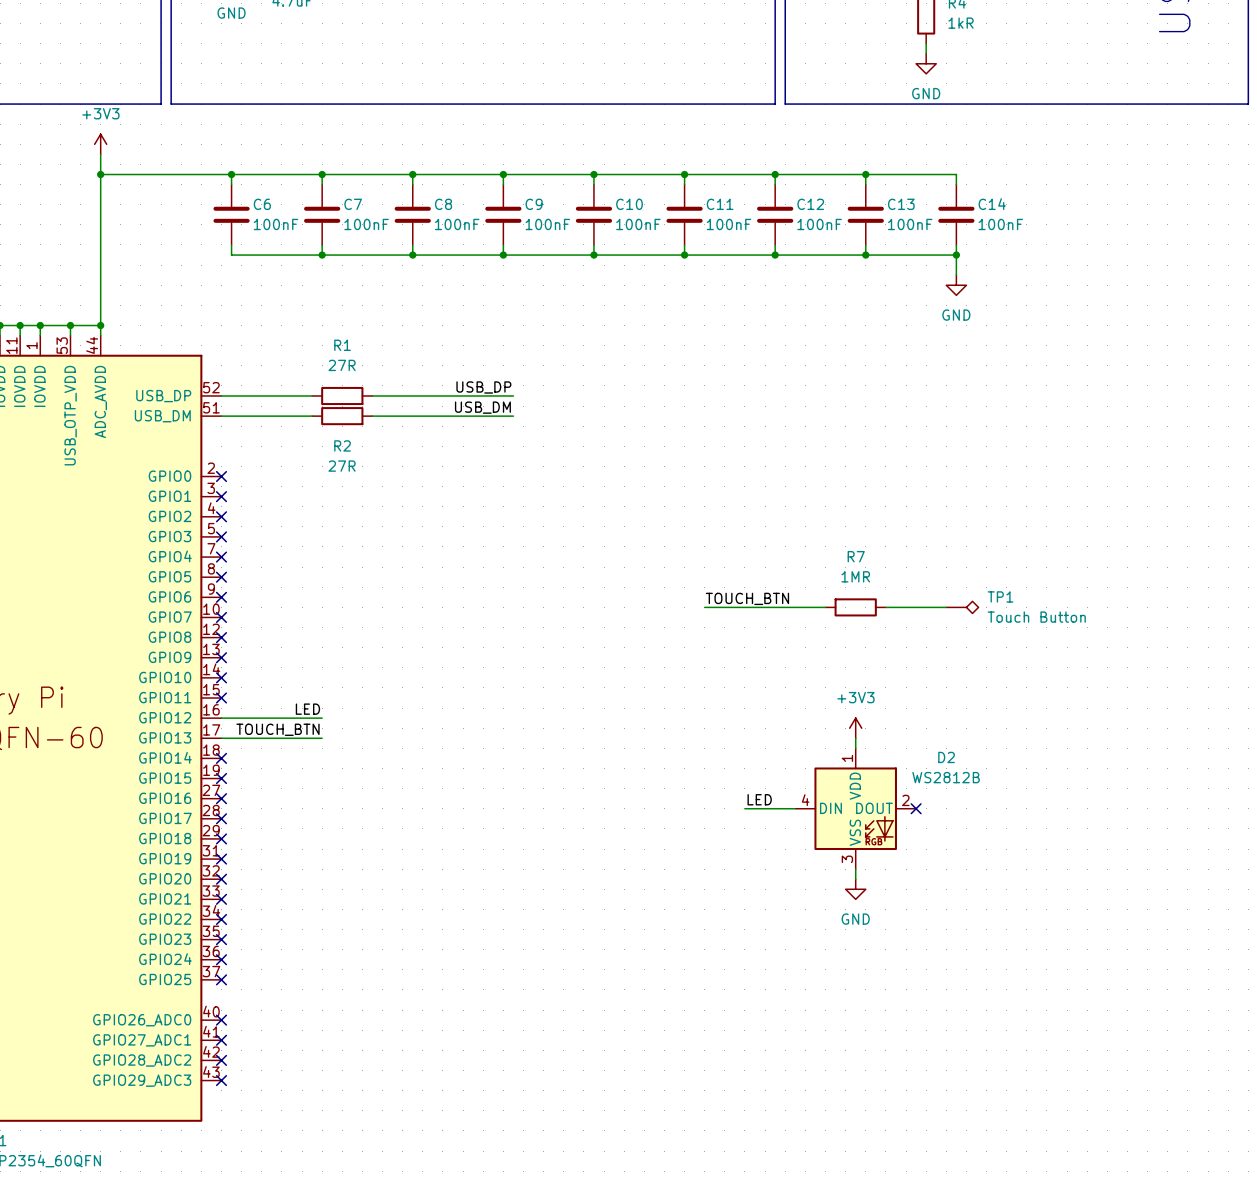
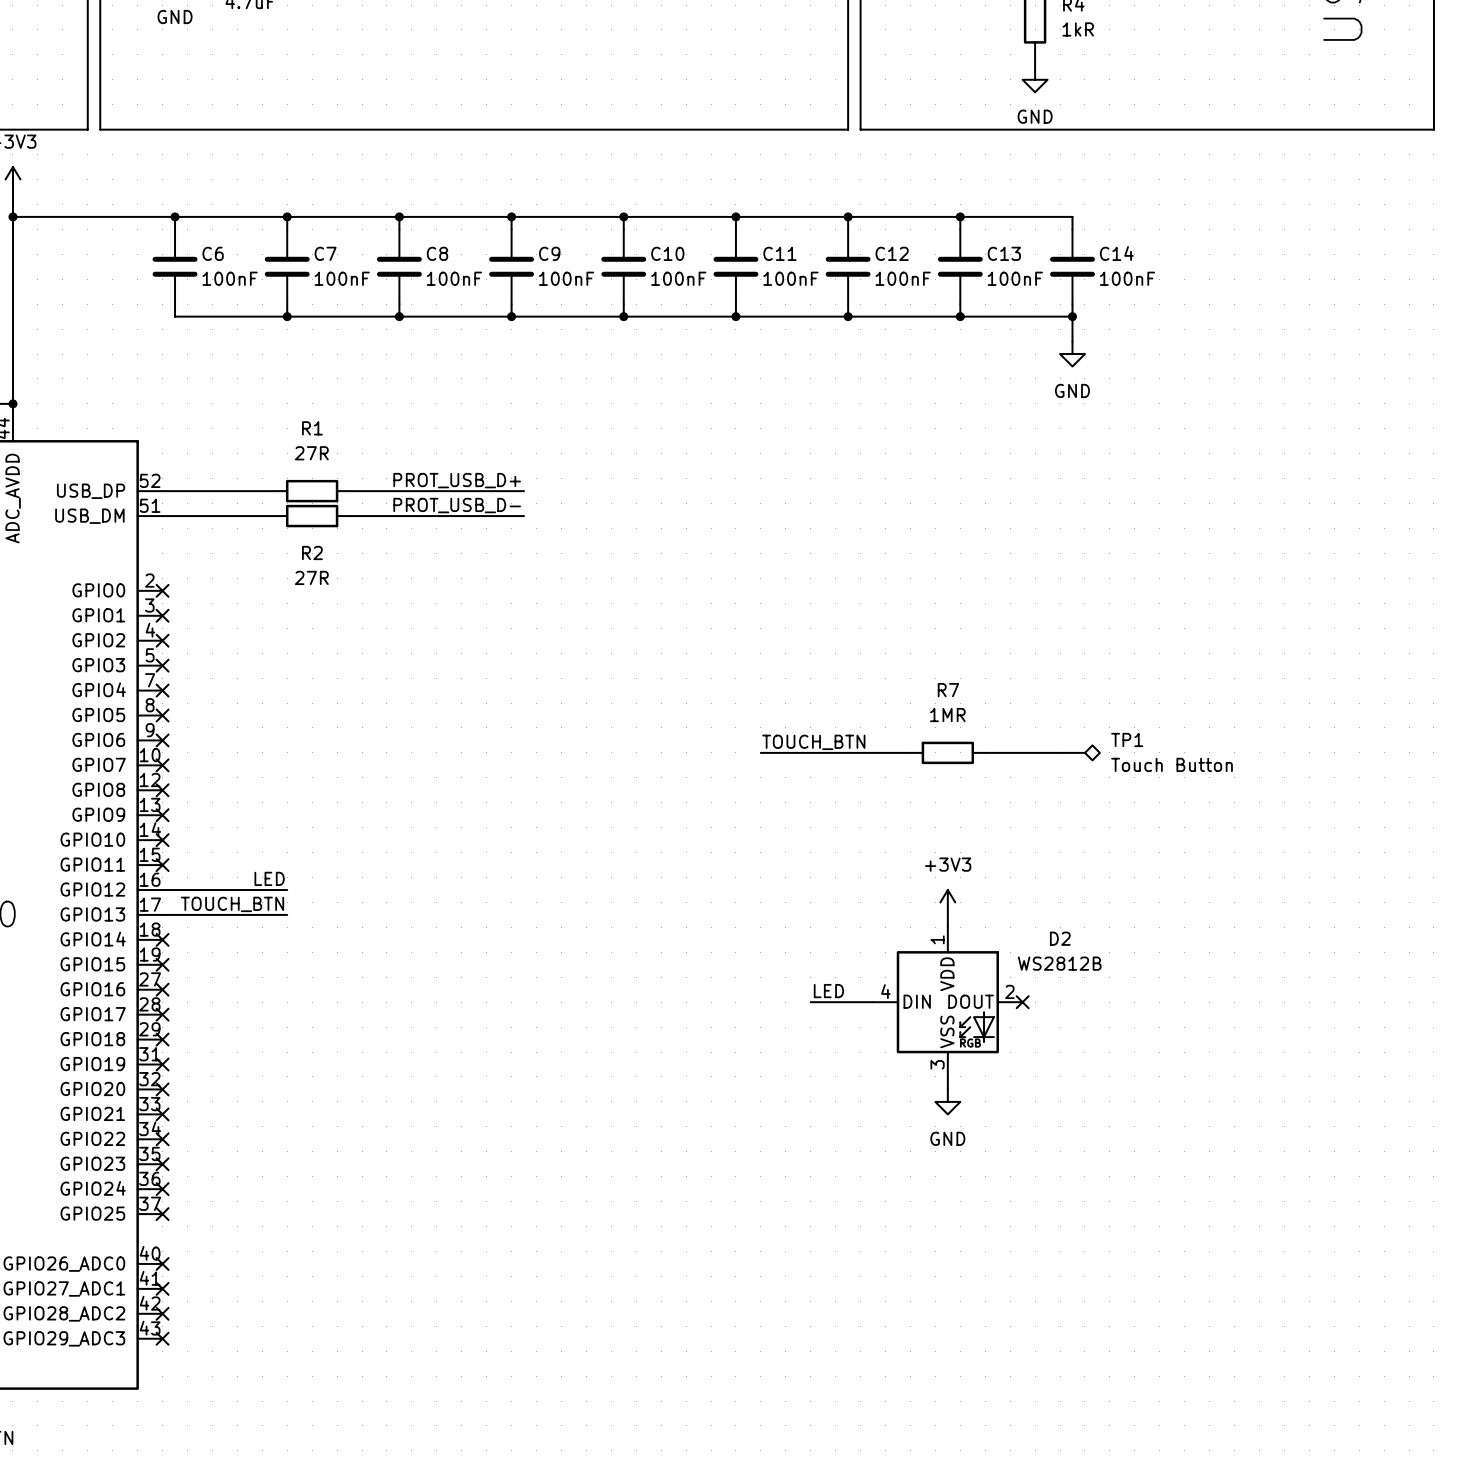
label: USB_DP (483, 387) -> PROT_USB_D+ (457, 480)
label: USB_DM (482, 407) -> PROT_USB_D- (457, 505)

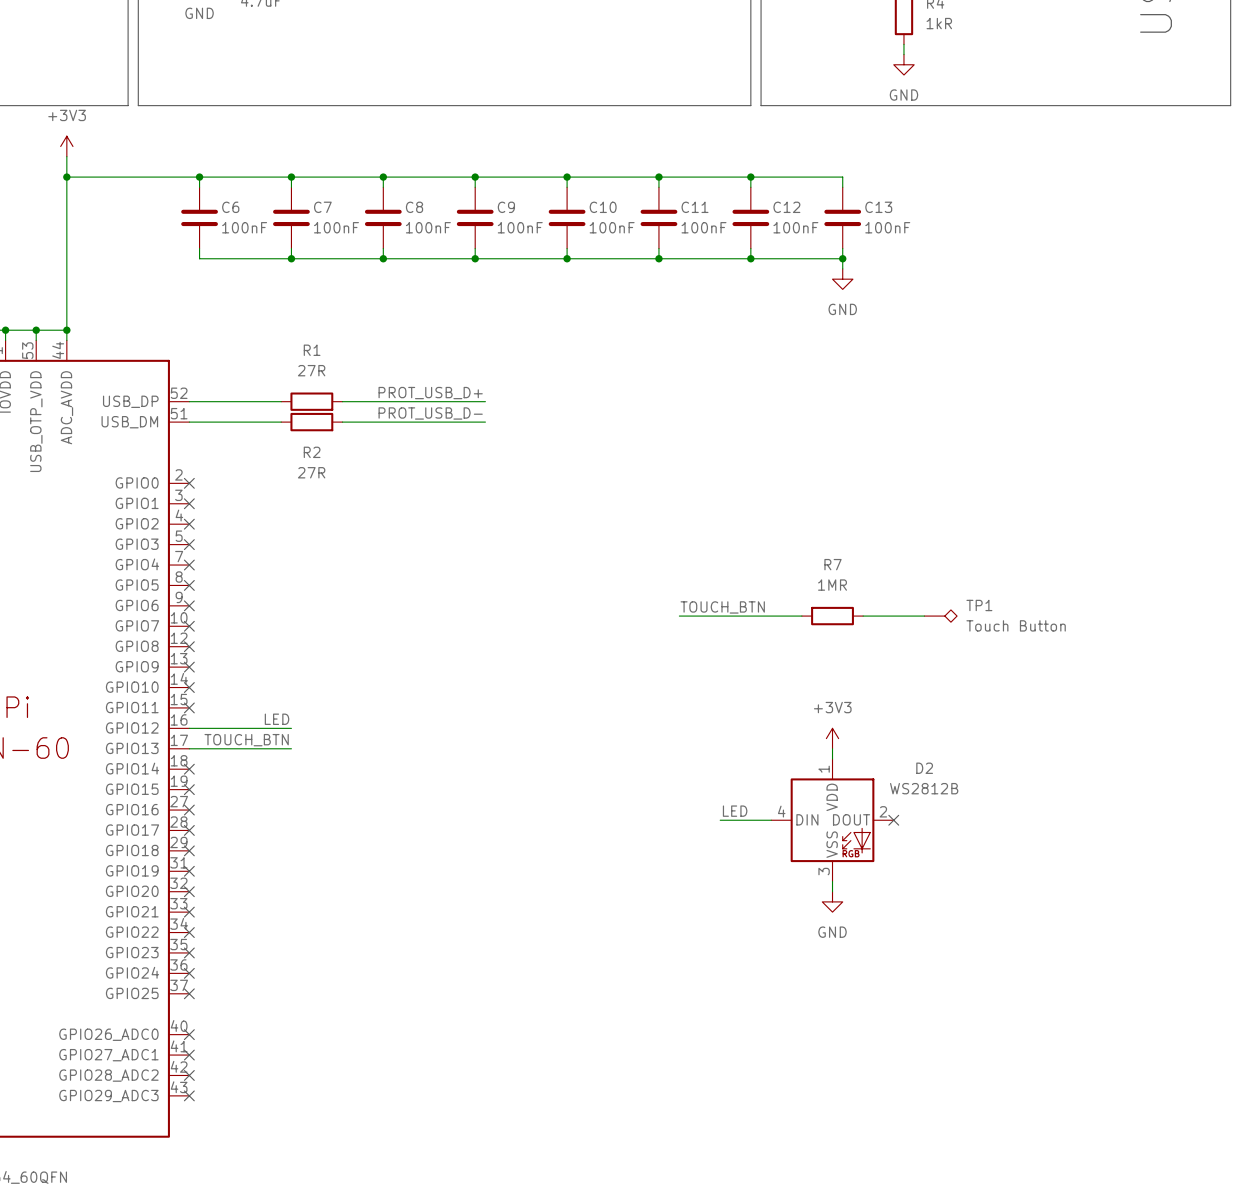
wire: (960, 216) (1072, 216) (1072, 229) -> none
junction: (960, 216) -> none
C14: 100nF (1072, 266) -> none
wire: (1072, 304) (1072, 341) -> none
wire: (960, 316) (1072, 316) -> (842, 258) (842, 268)
junction: (1072, 316) -> none
power symbol position: GND (1072, 354) -> GND (842, 279)

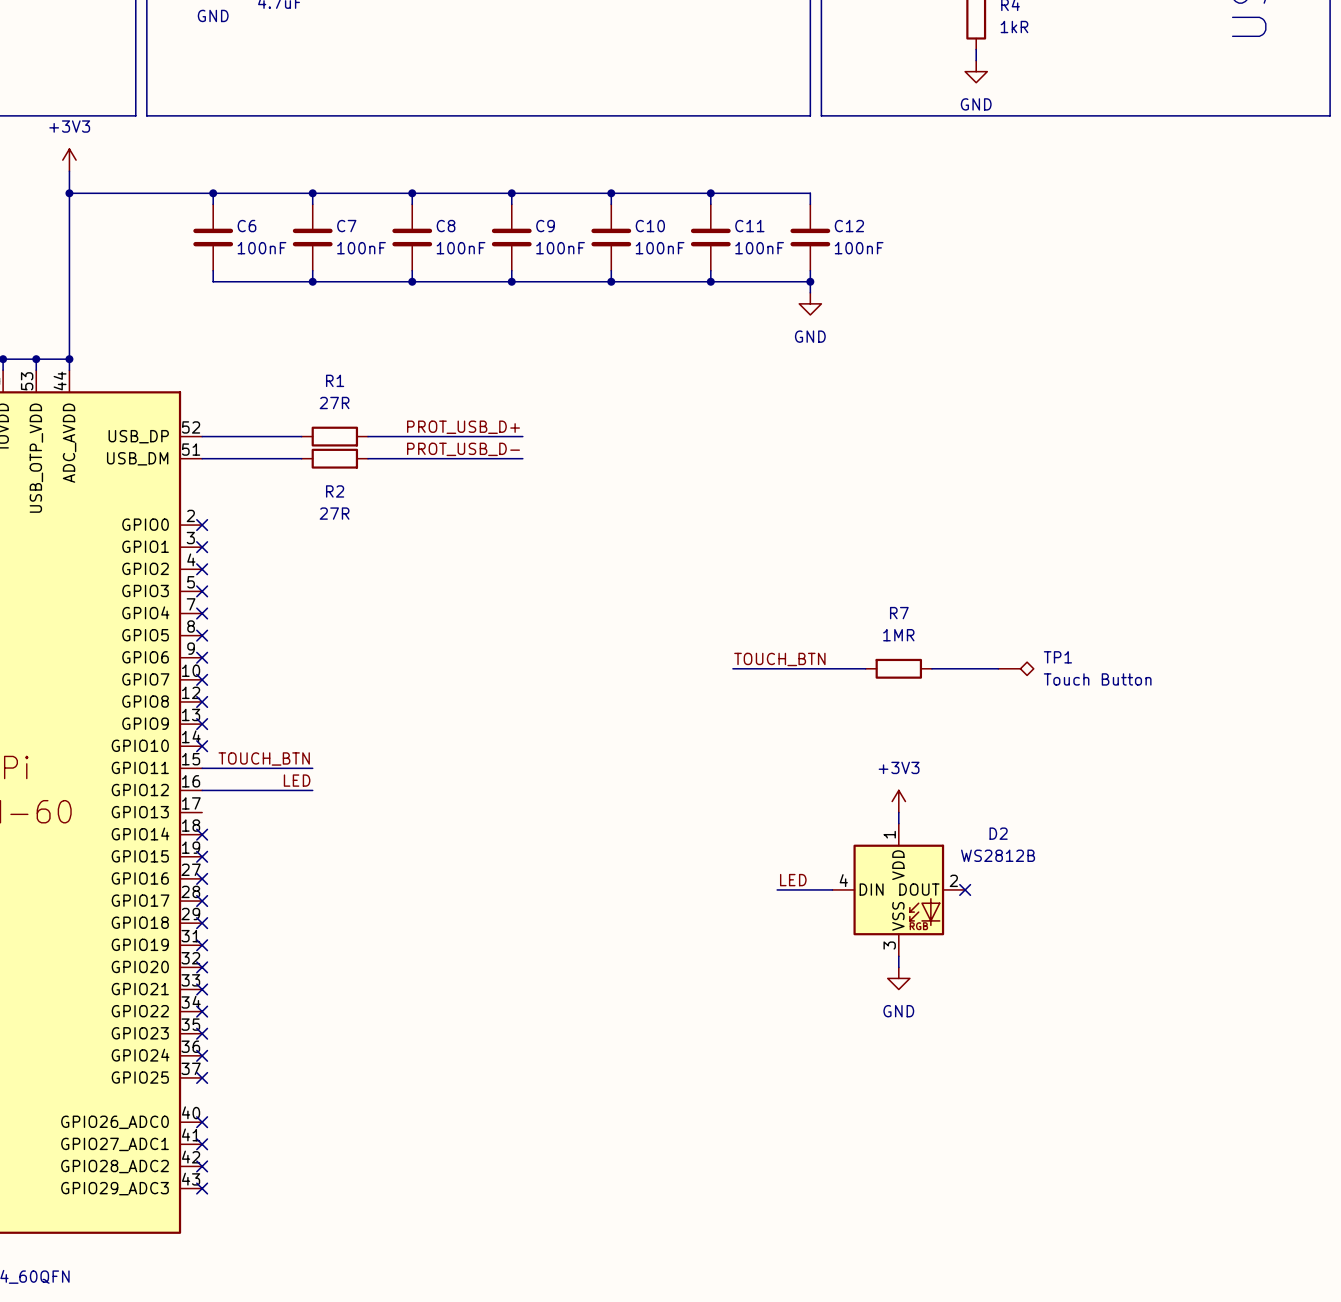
wire: (750, 177) (842, 177) (842, 187) -> none
junction: (750, 177) -> none
C13: 100nF (842, 217) -> none
wire: (842, 248) (842, 268) -> none
wire: (750, 258) (842, 258) -> (810, 281) (810, 292)
junction: (842, 258) -> none
power symbol position: GND (842, 279) -> GND (810, 303)
no-connect mark: (189, 707) -> none
label position: TOUCH_BTN (246, 740) -> TOUCH_BTN (264, 758)
wire: (189, 748) (291, 748) -> (202, 768) (312, 768)

